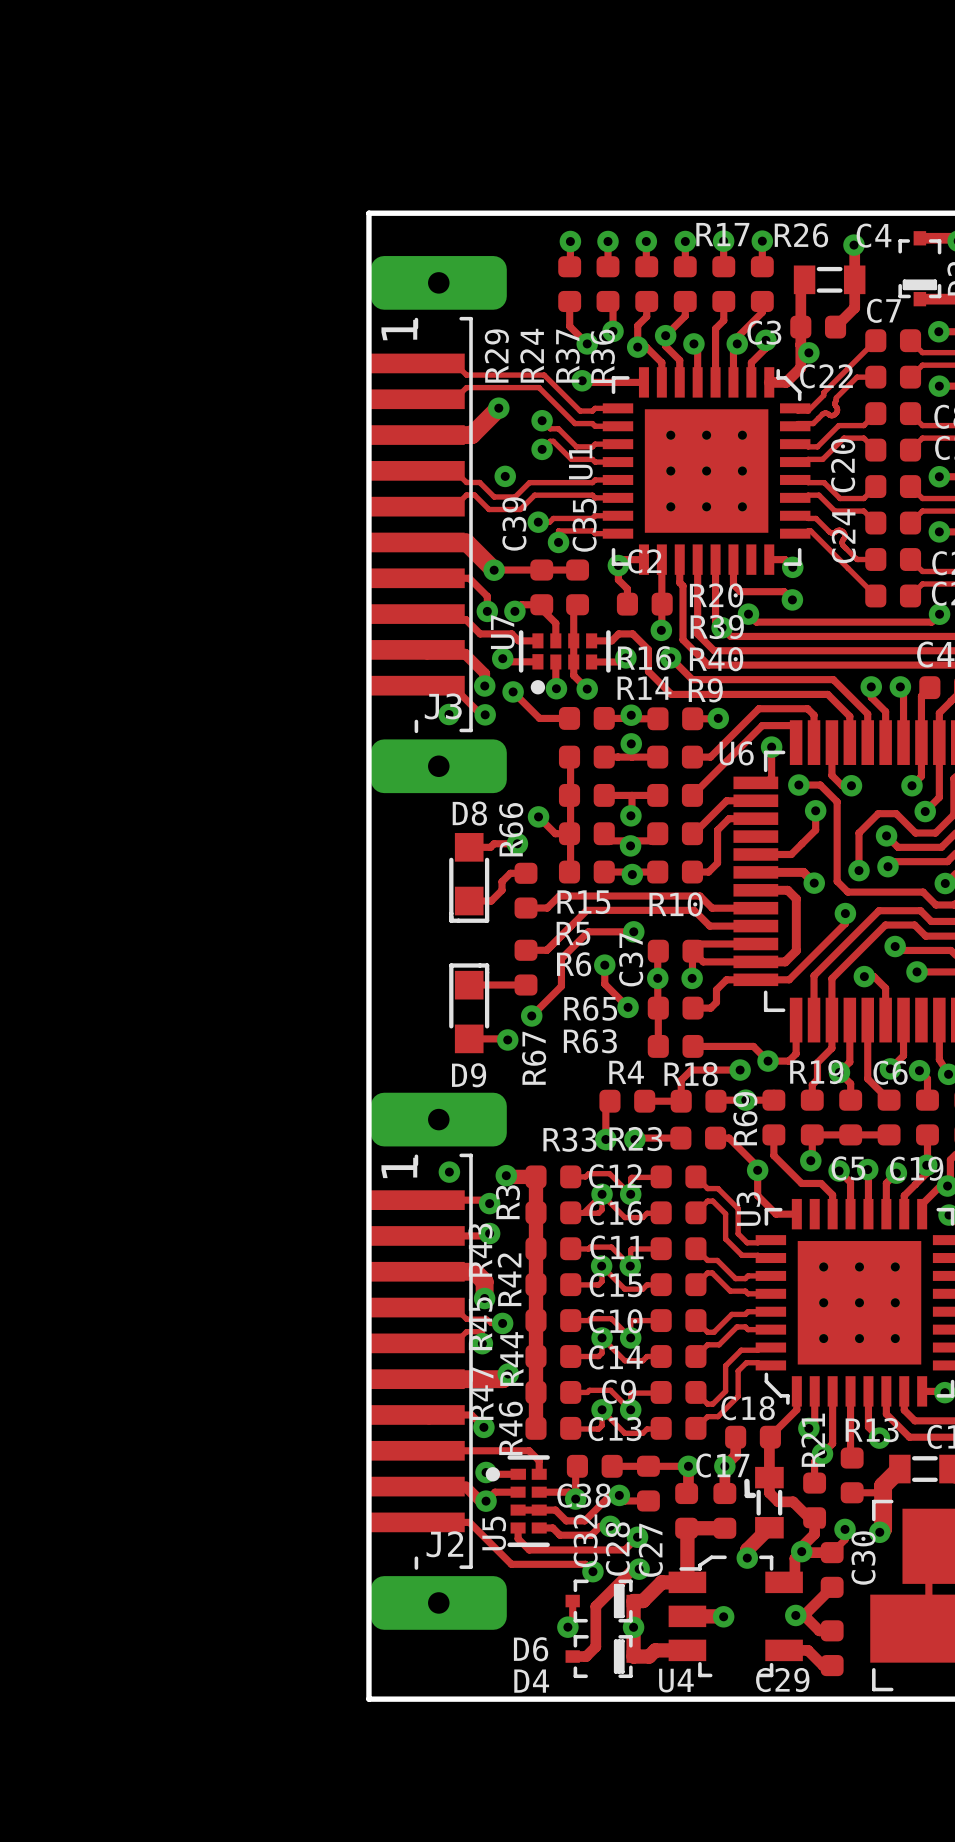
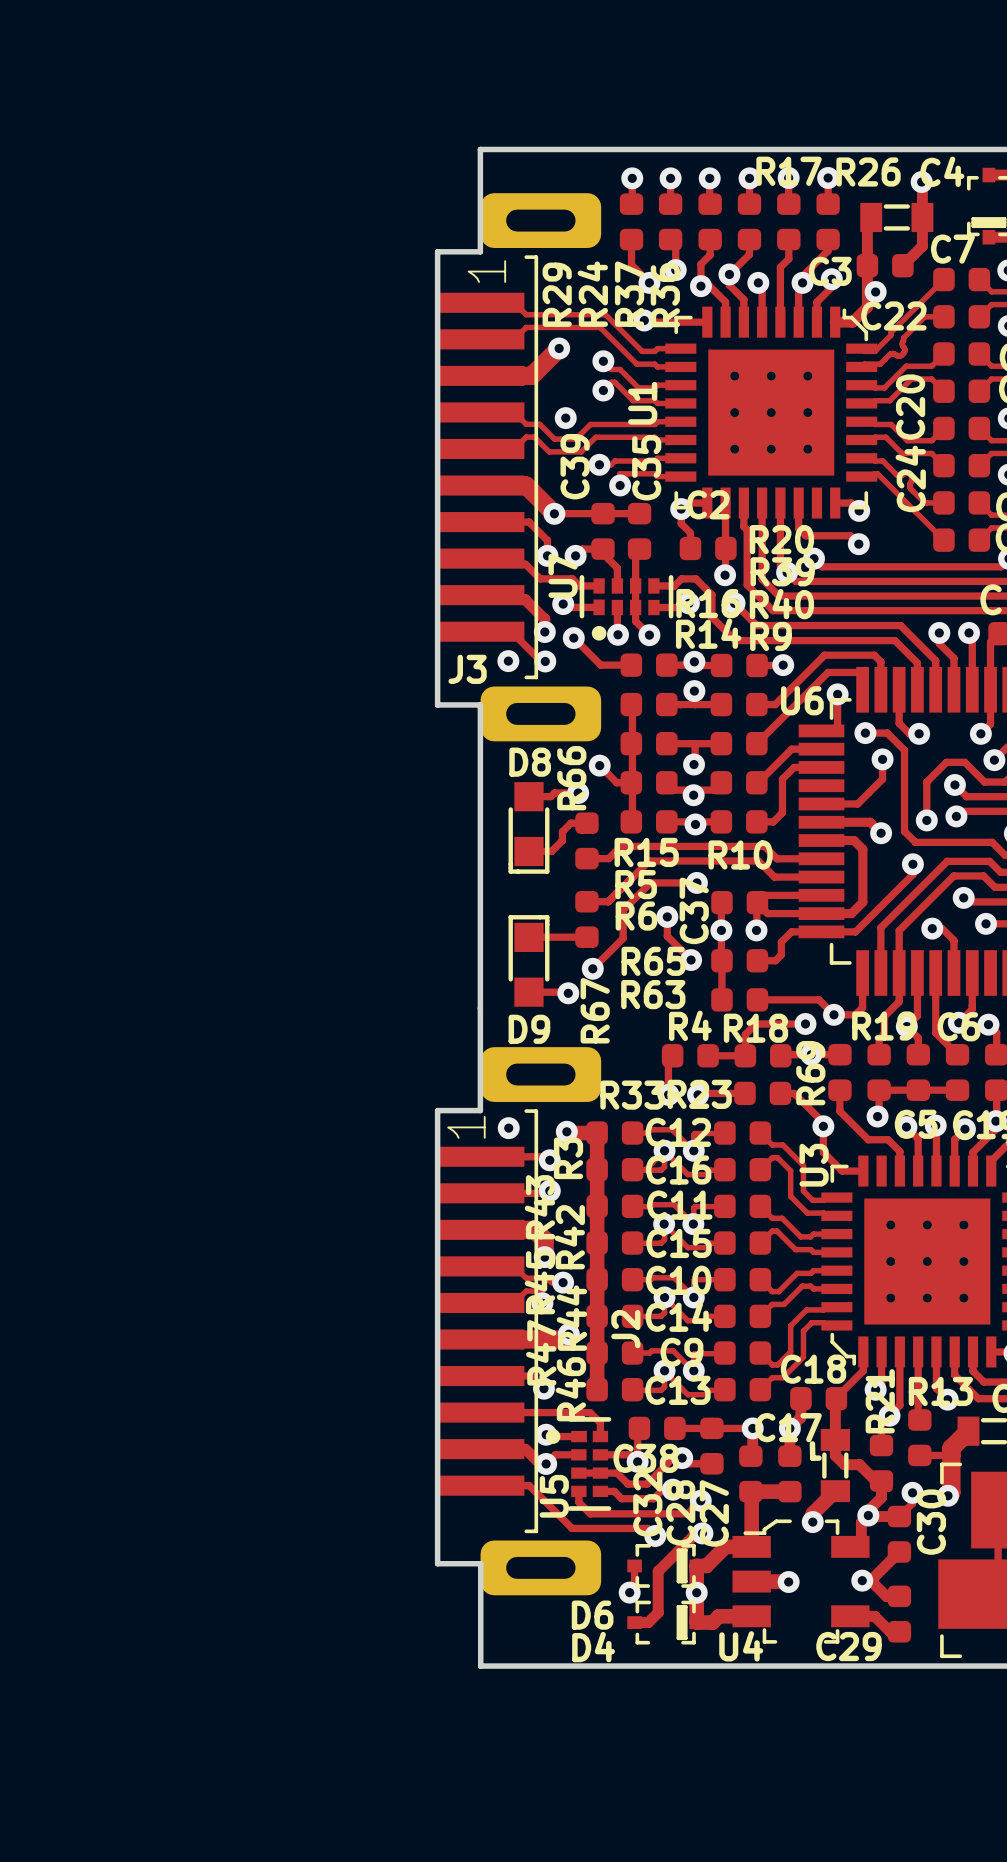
board edge: (421, 213) (368, 213) (368, 1699) (421, 1699) -> (480, 149) (480, 251) (437, 251) (437, 704) (480, 704) (480, 1110) (437, 1110) (437, 1563) (480, 1563) (480, 1666)
J3 footprint: [369, 256, 507, 794] -> [438, 193, 602, 742]
J2 footprint: [369, 1092, 507, 1630] -> [438, 1047, 602, 1596]
J2 name position: J2 (444, 1544) -> J2 (625, 1329)

